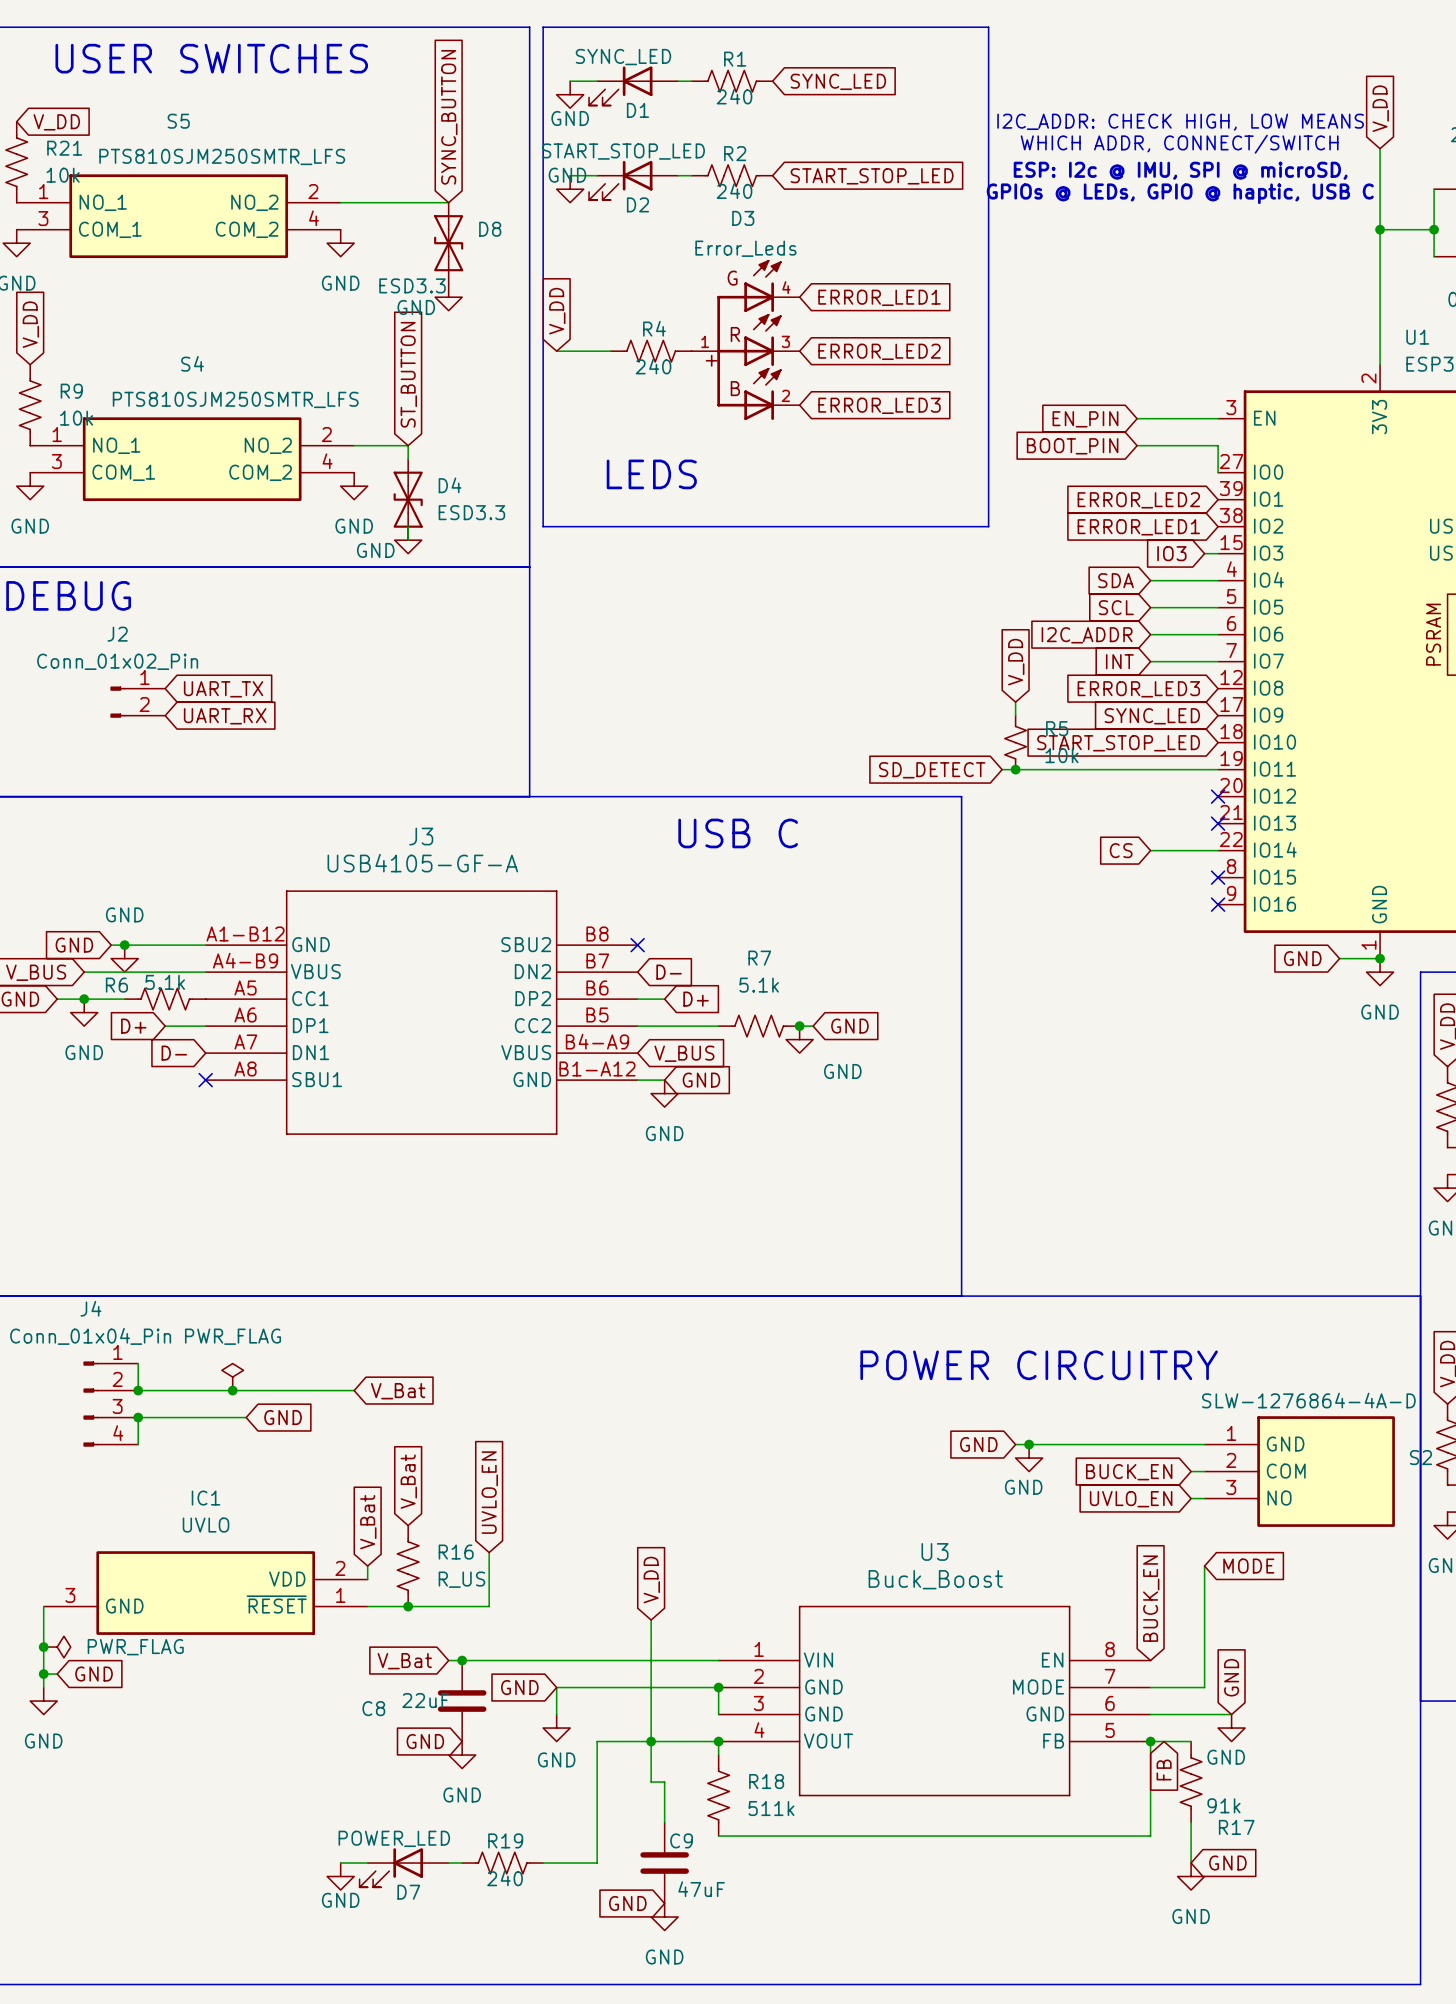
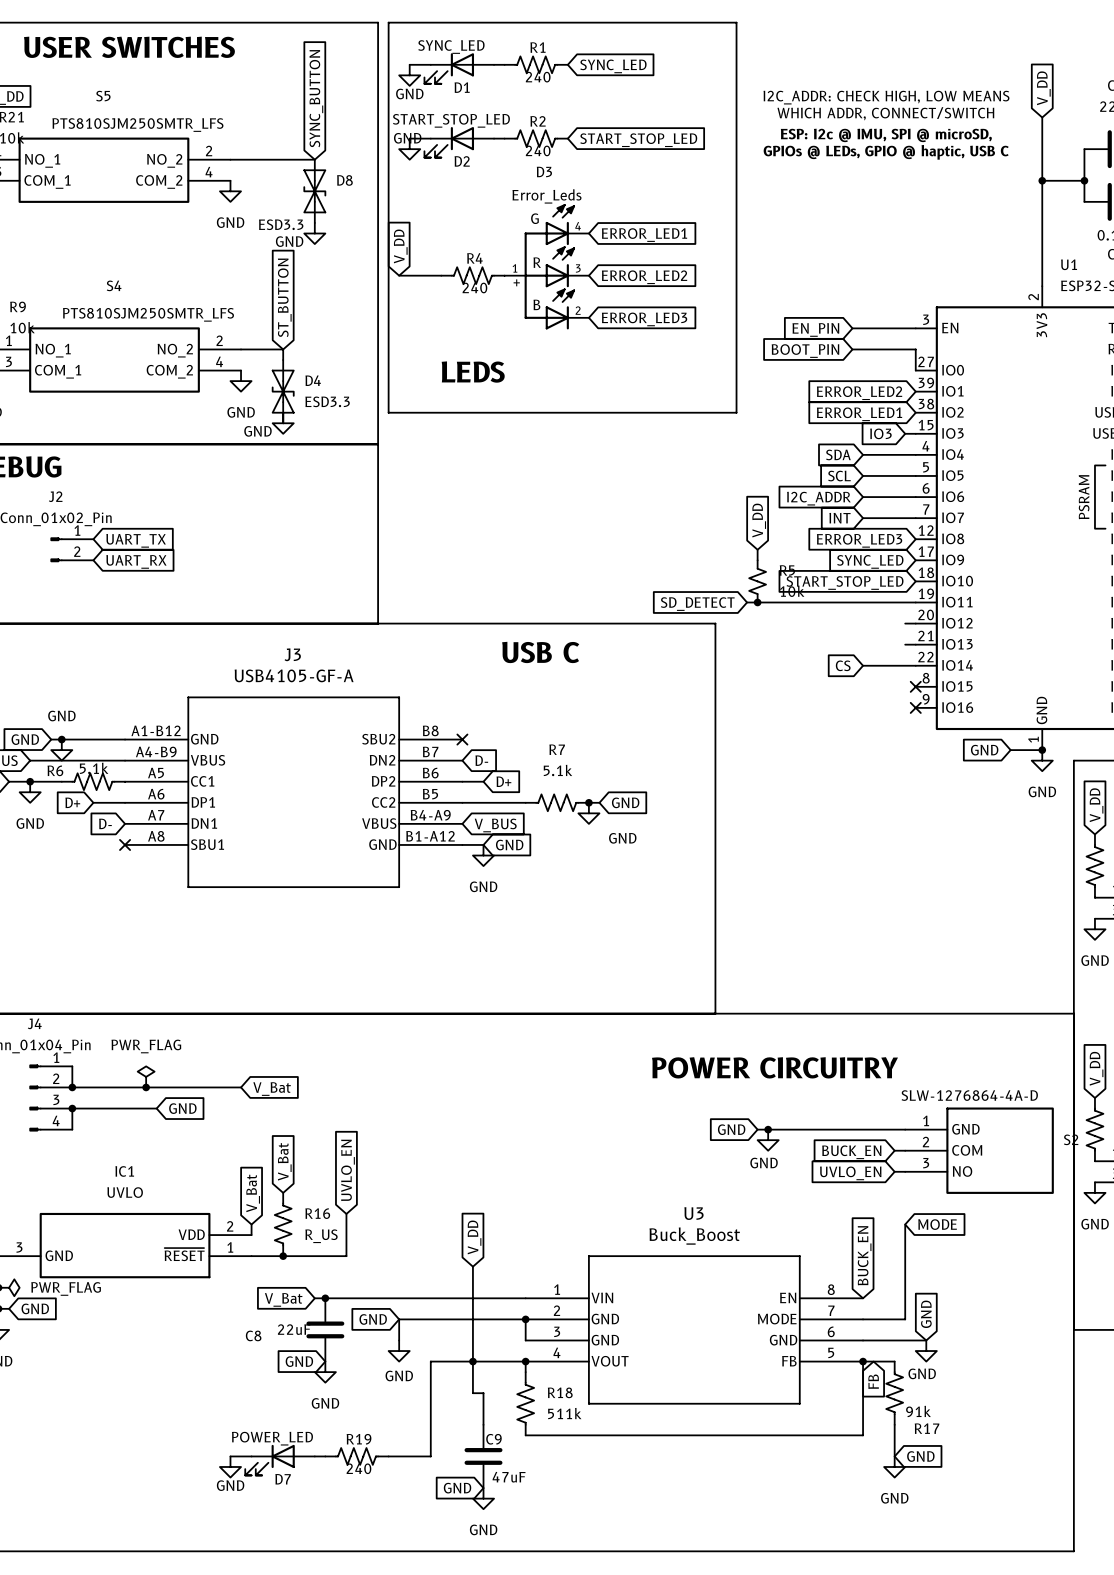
wire: none -> (905, 623) (915, 623)
no-connect mark: (1218, 796) -> none
wire: none -> (905, 644) (915, 644)
no-connect mark: (1218, 823) -> none

